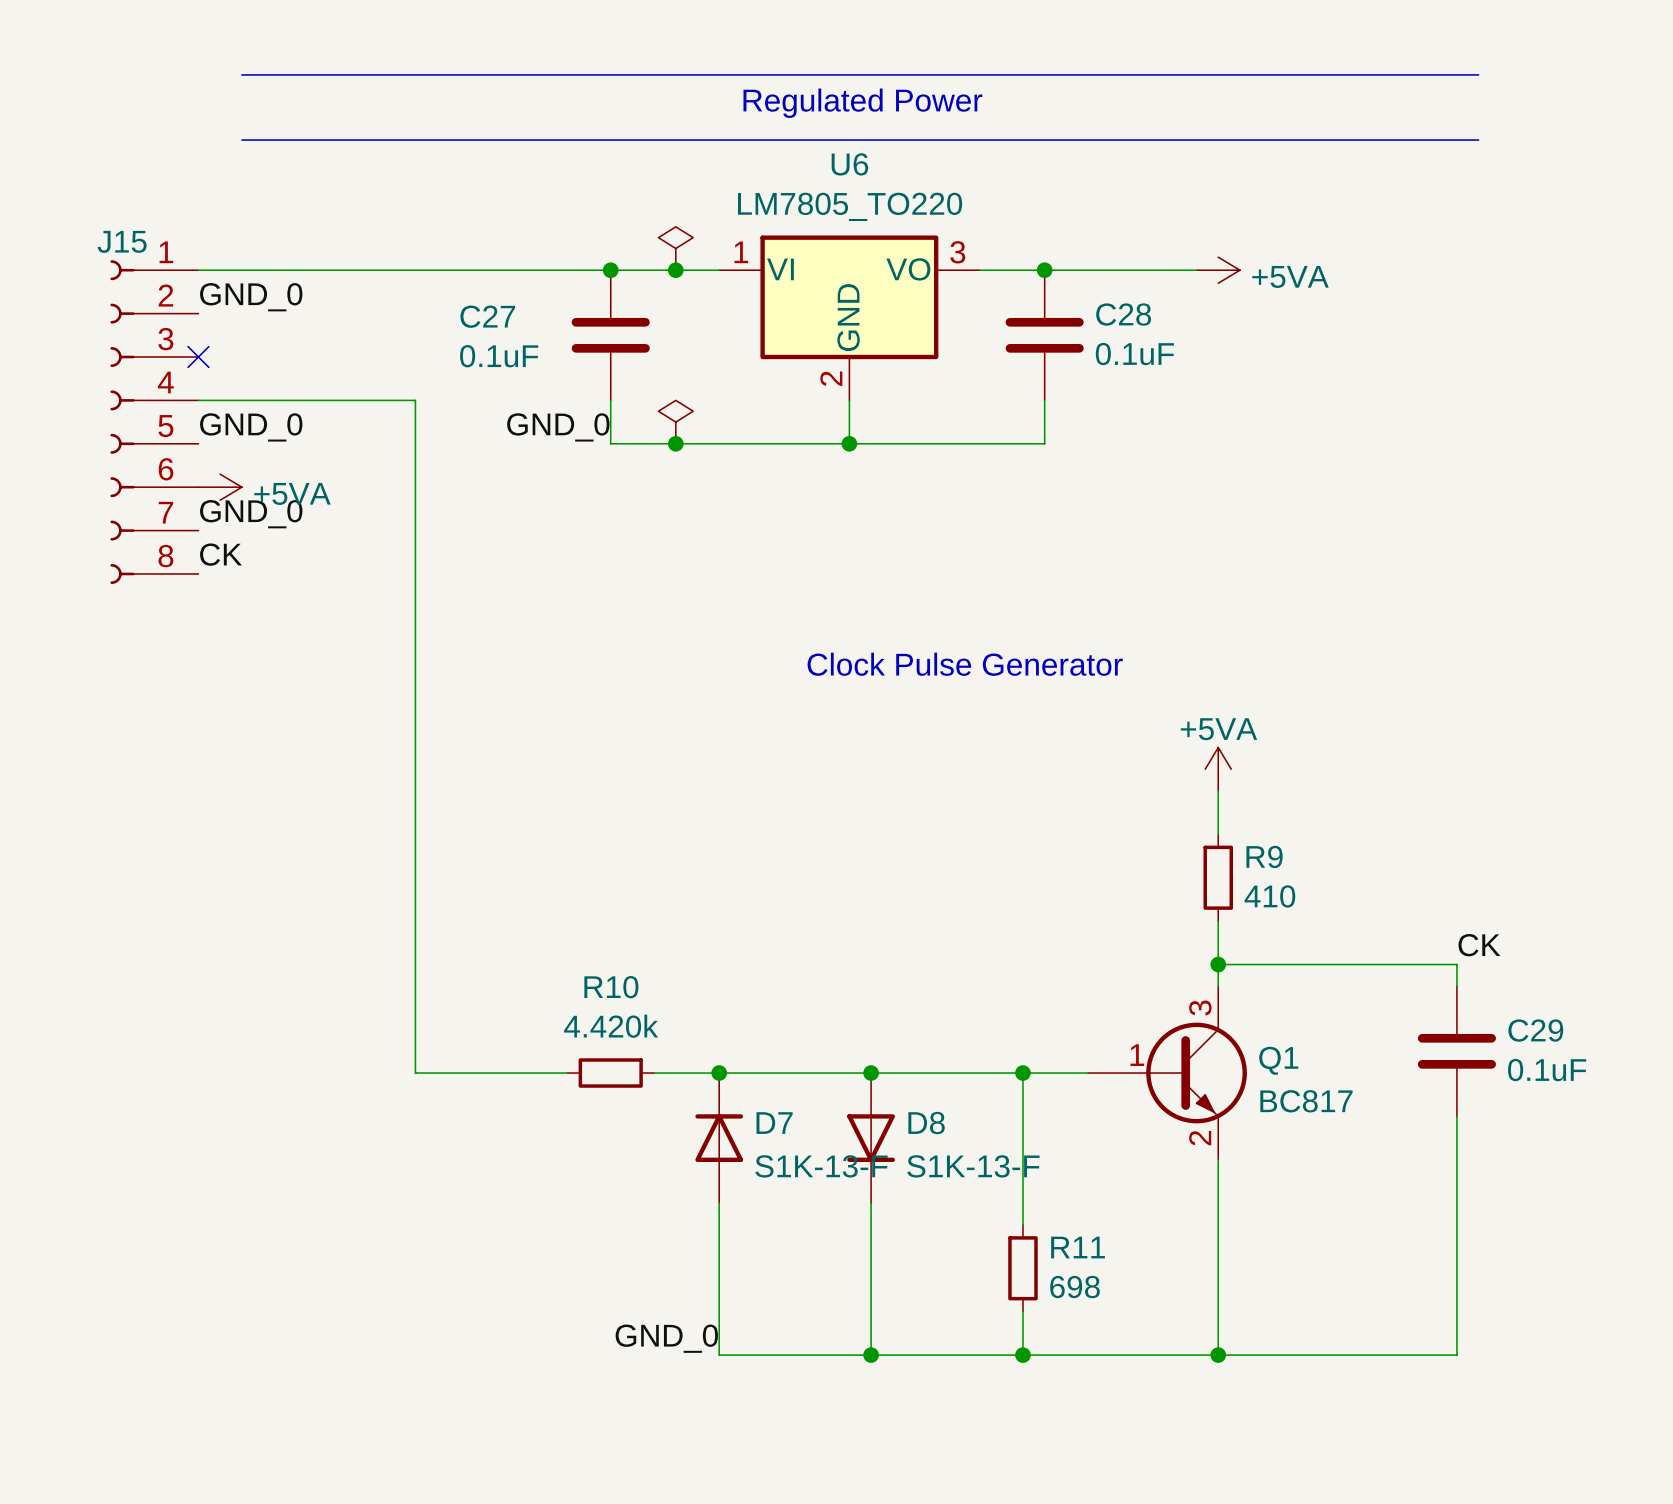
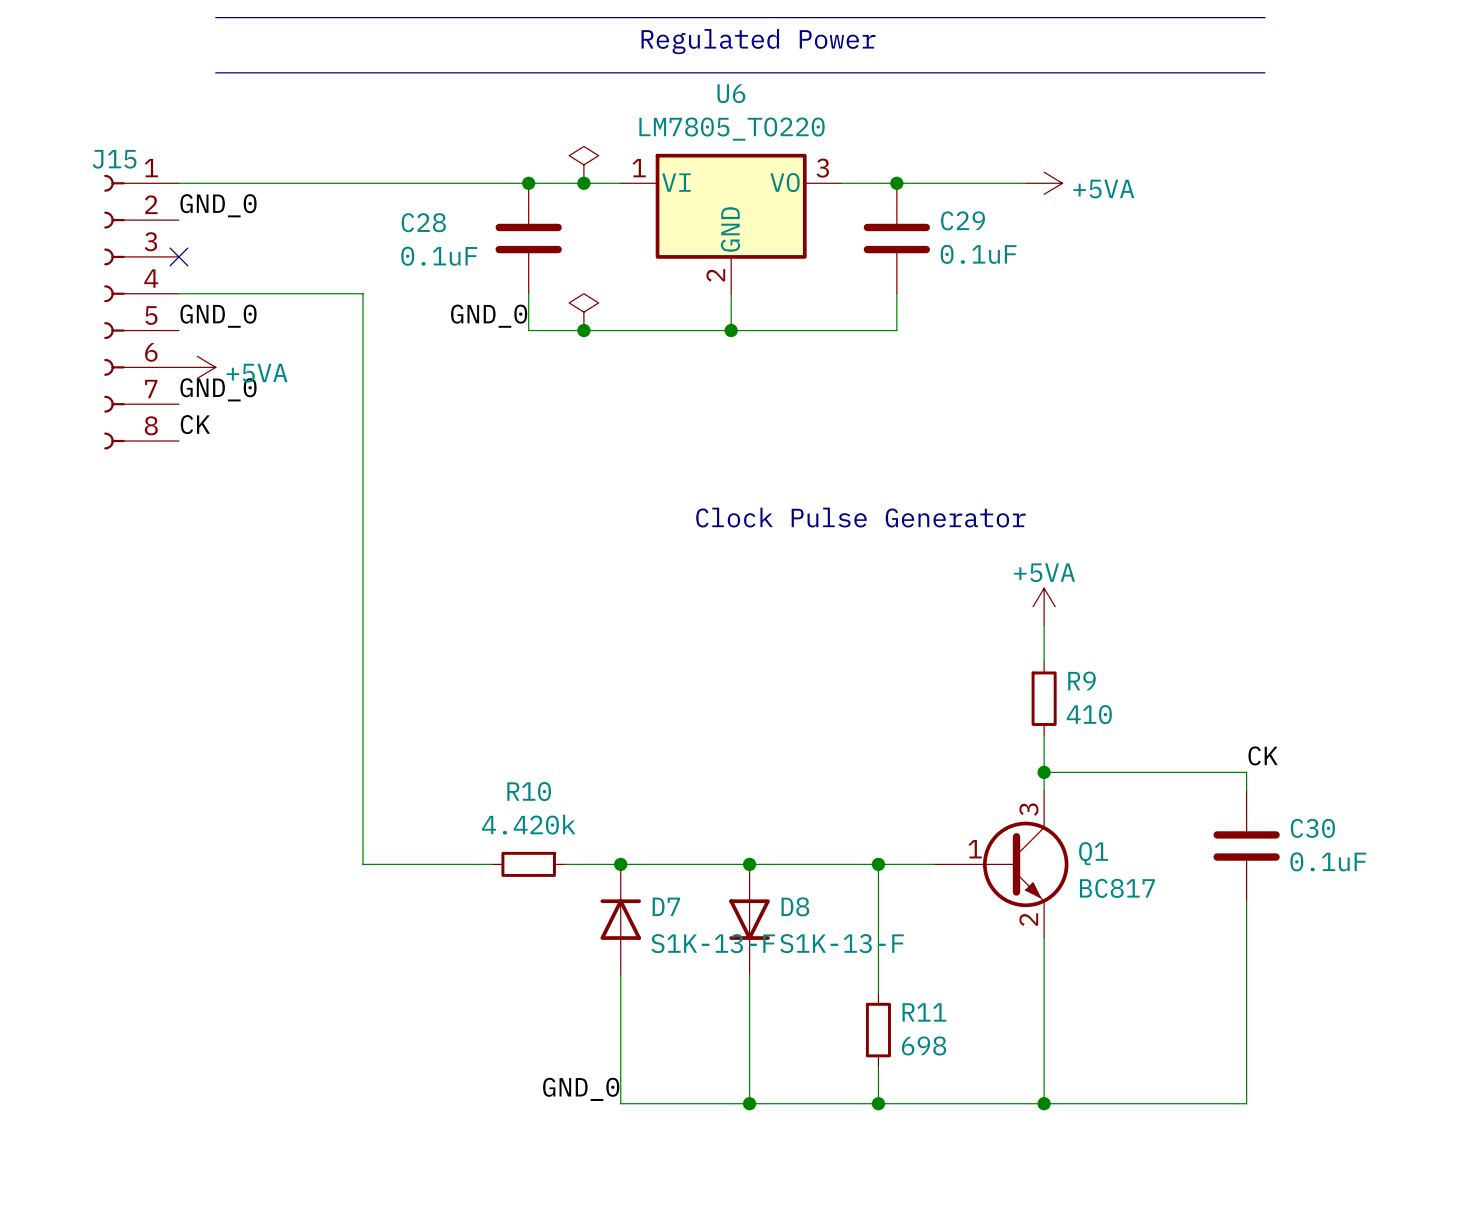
C28 name: C28 (1123, 314) -> C29 (963, 220)
C27 name: C27 (487, 316) -> C28 (423, 222)
C29 name: C29 (1535, 1030) -> C30 (1312, 828)

